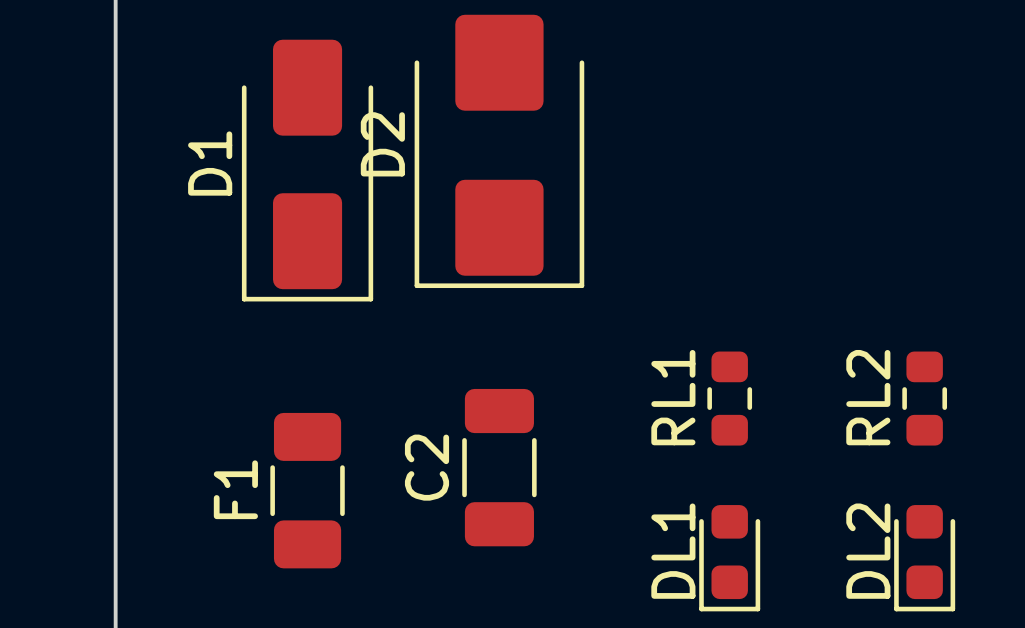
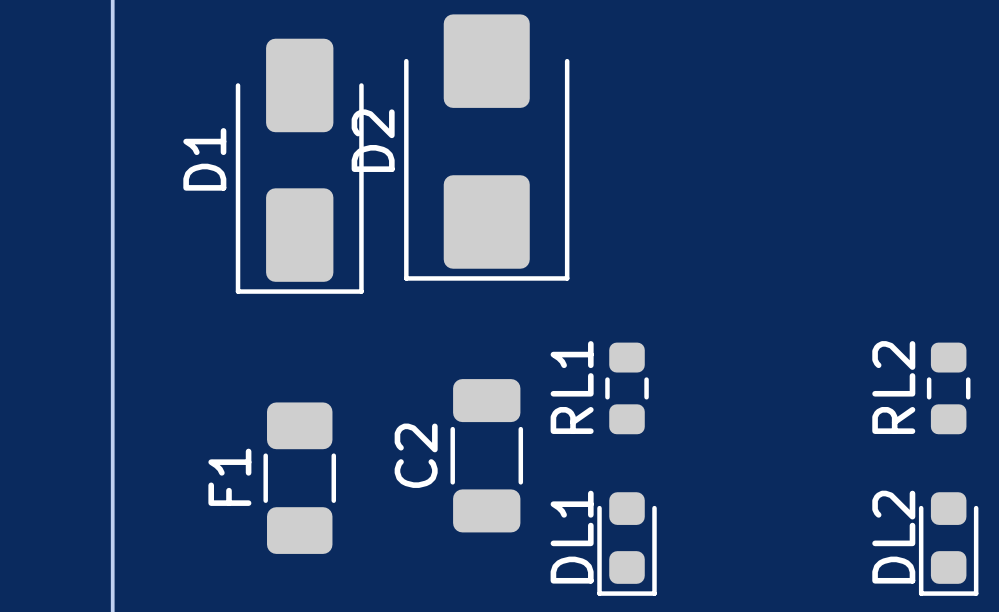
RL1 position: (729, 398) -> (627, 388)
RL2 position: (924, 398) -> (948, 388)
DL1 position: (729, 558) -> (627, 544)
DL2 position: (924, 558) -> (948, 544)

